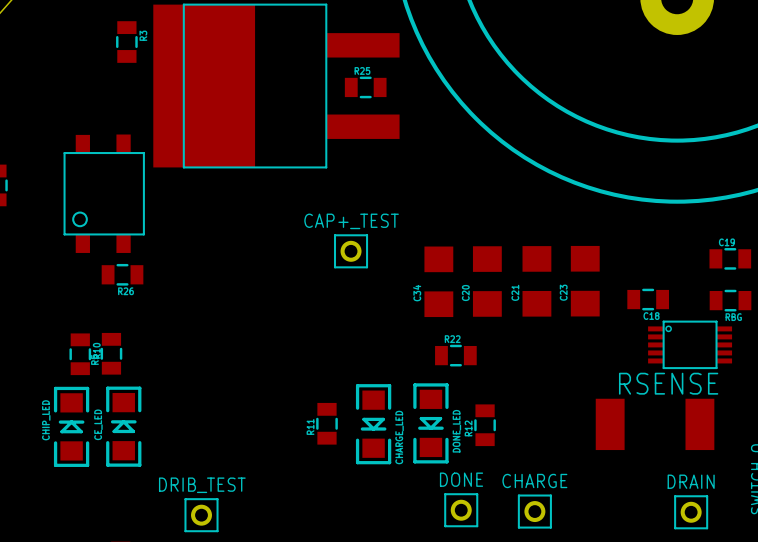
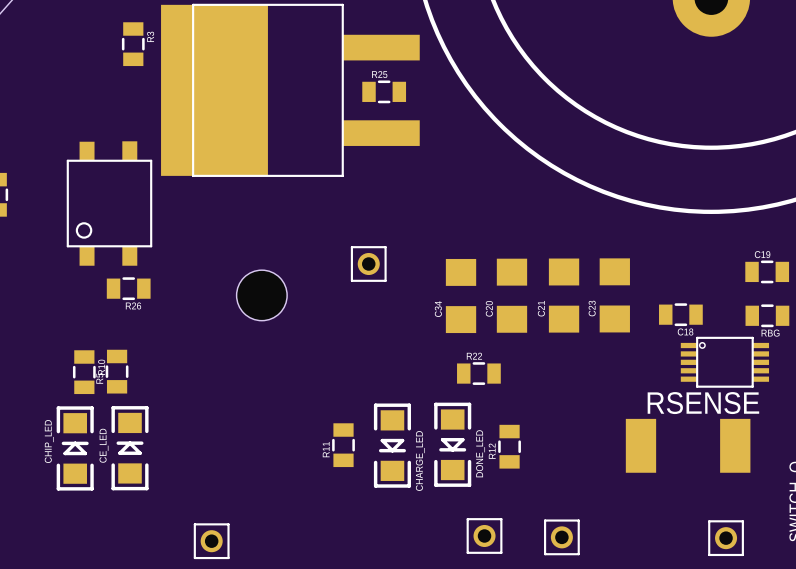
CAP+_TEST name: CAP+_TEST (351, 221) -> none
hole: none -> (261, 295)
DONE name: DONE (461, 479) -> none
CHARGE name: CHARGE (534, 480) -> none
DRAIN name: DRAIN (691, 481) -> none
DRIB_TEST name: DRIB_TEST (202, 485) -> none

